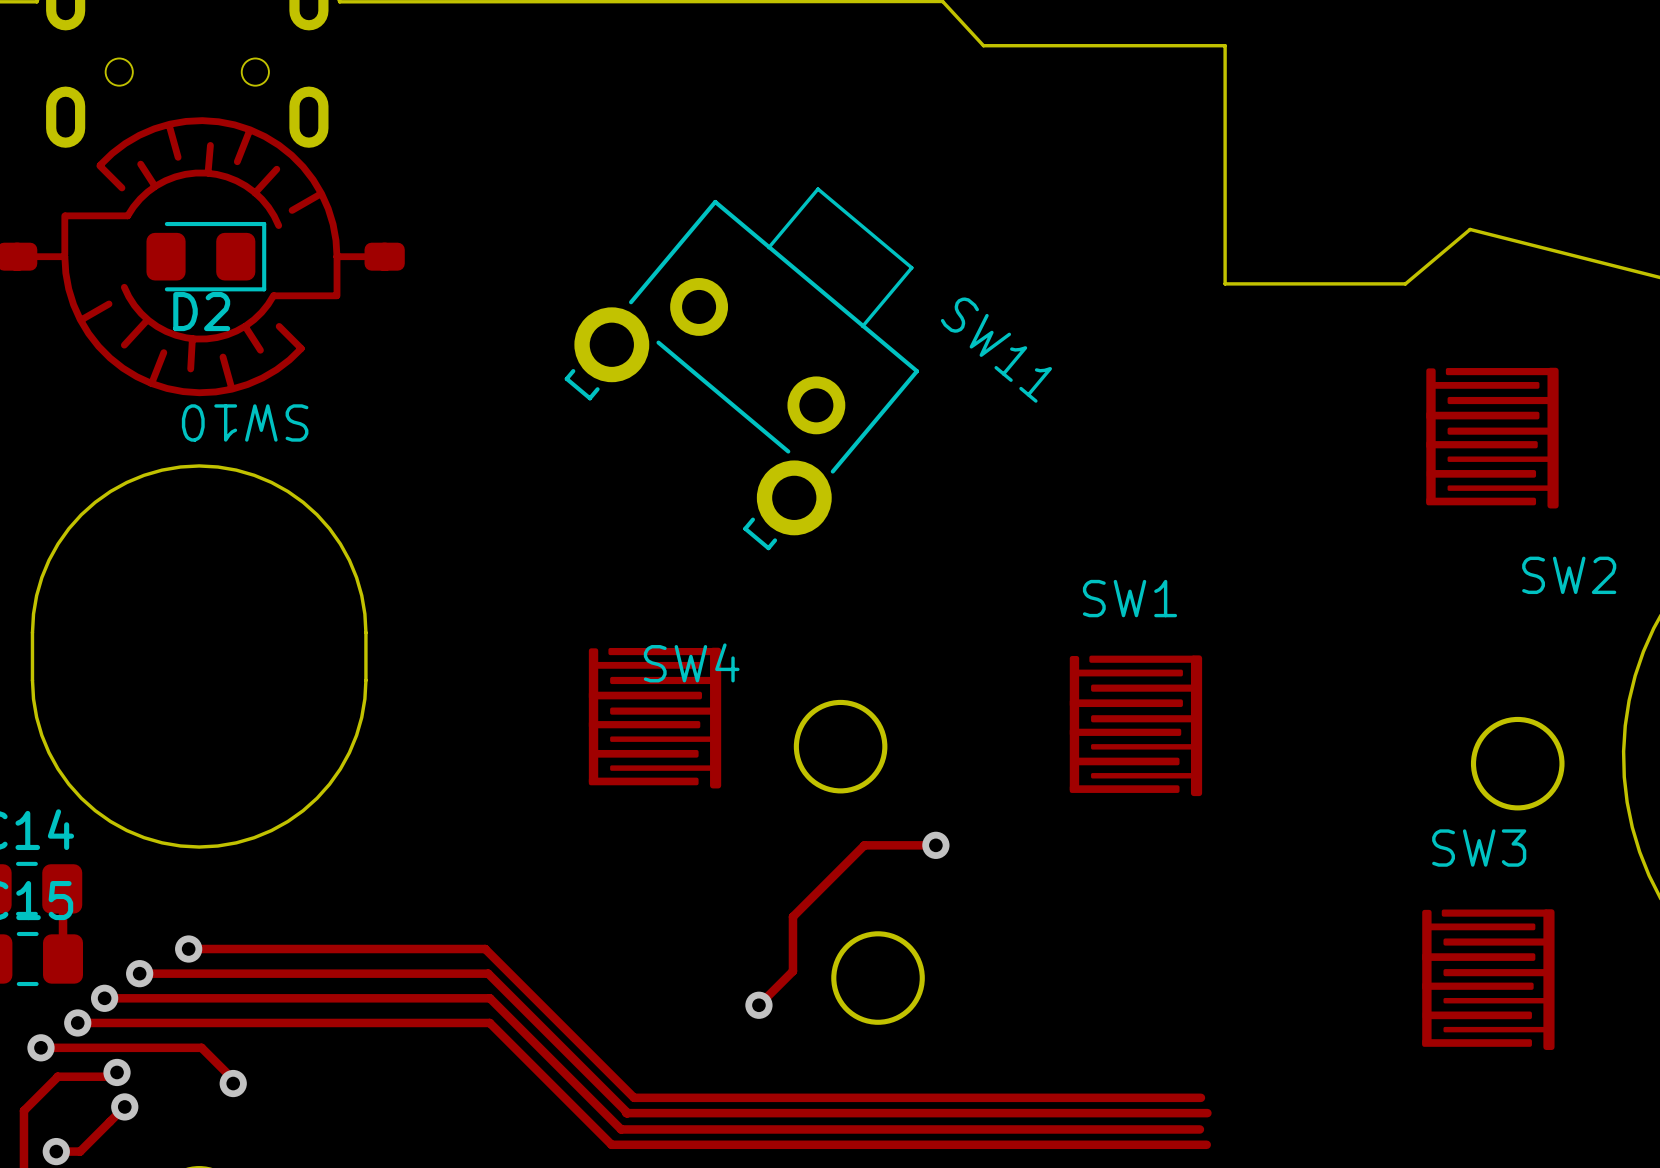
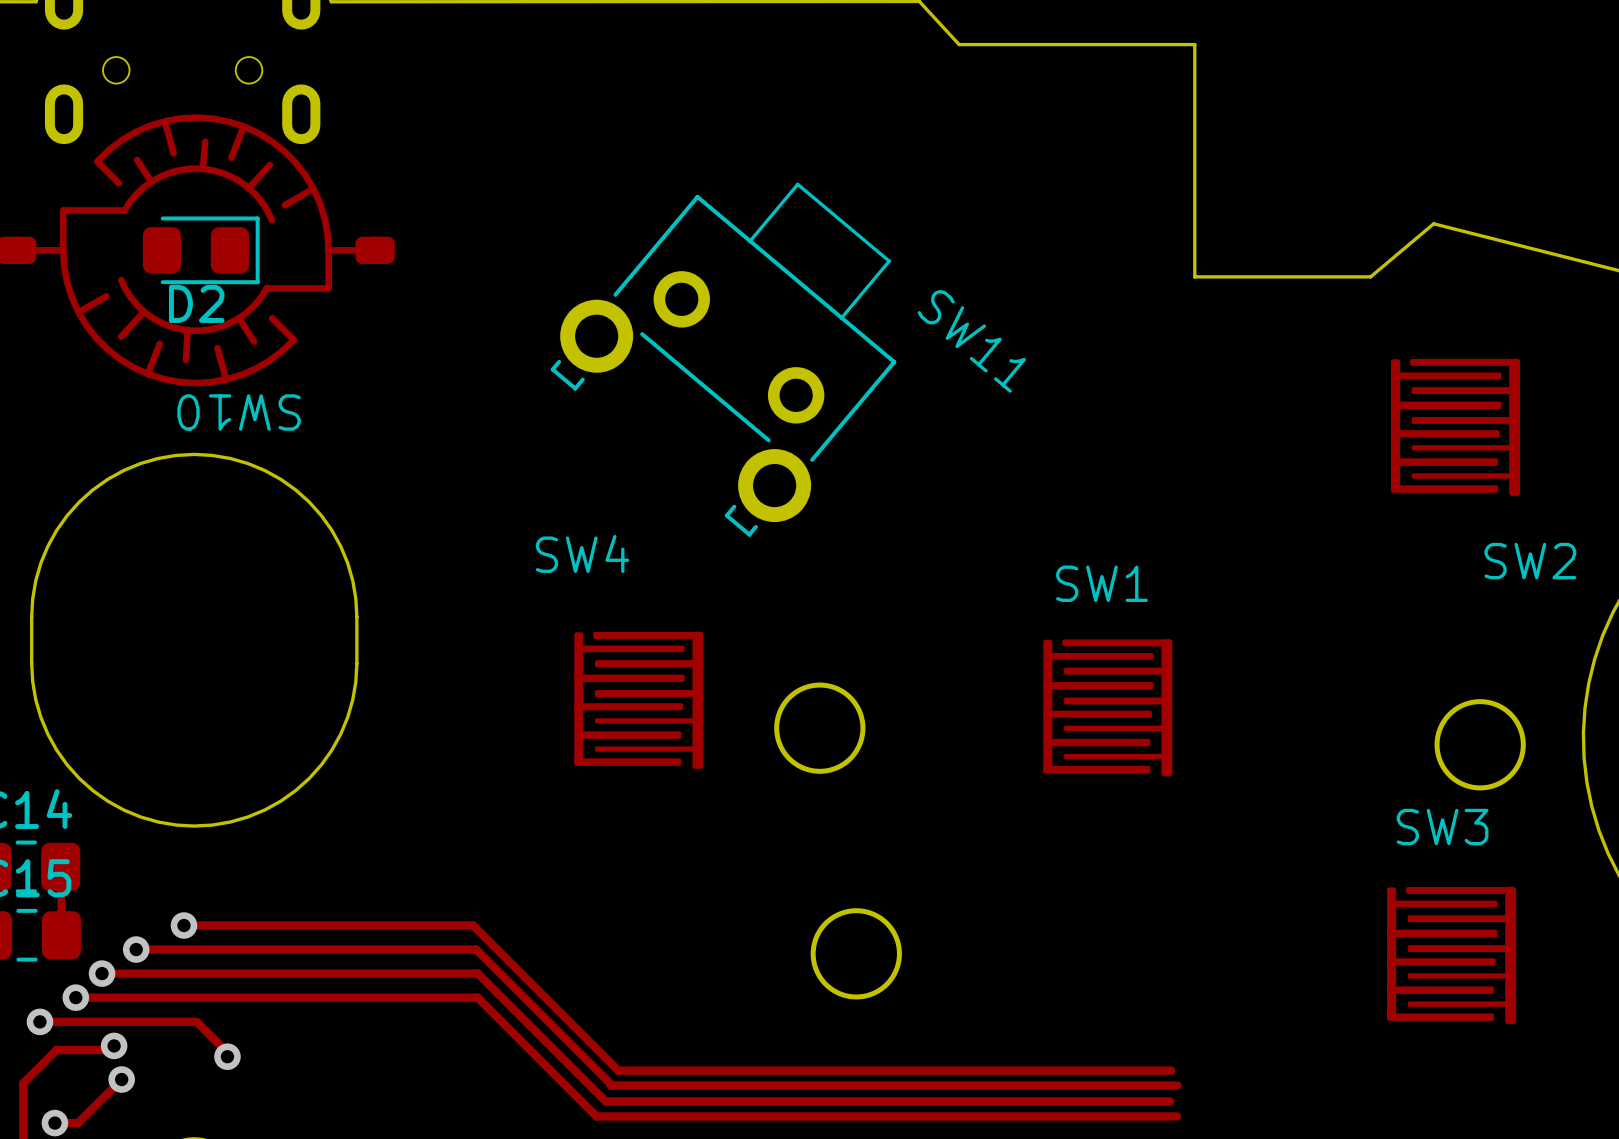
SW4 name position: SW4 (691, 662) -> SW4 (582, 553)
track: (935, 845) (864, 845) (792, 916) (792, 971) (758, 1005) -> none
via: (935, 845) -> none
via: (758, 1005) -> none

